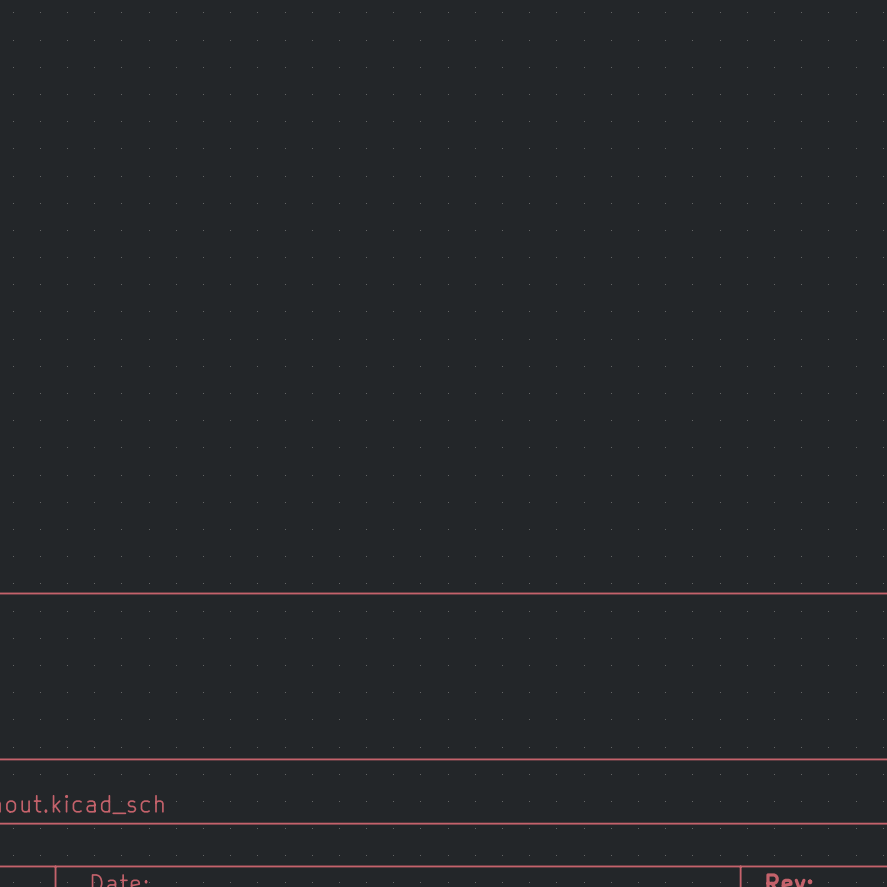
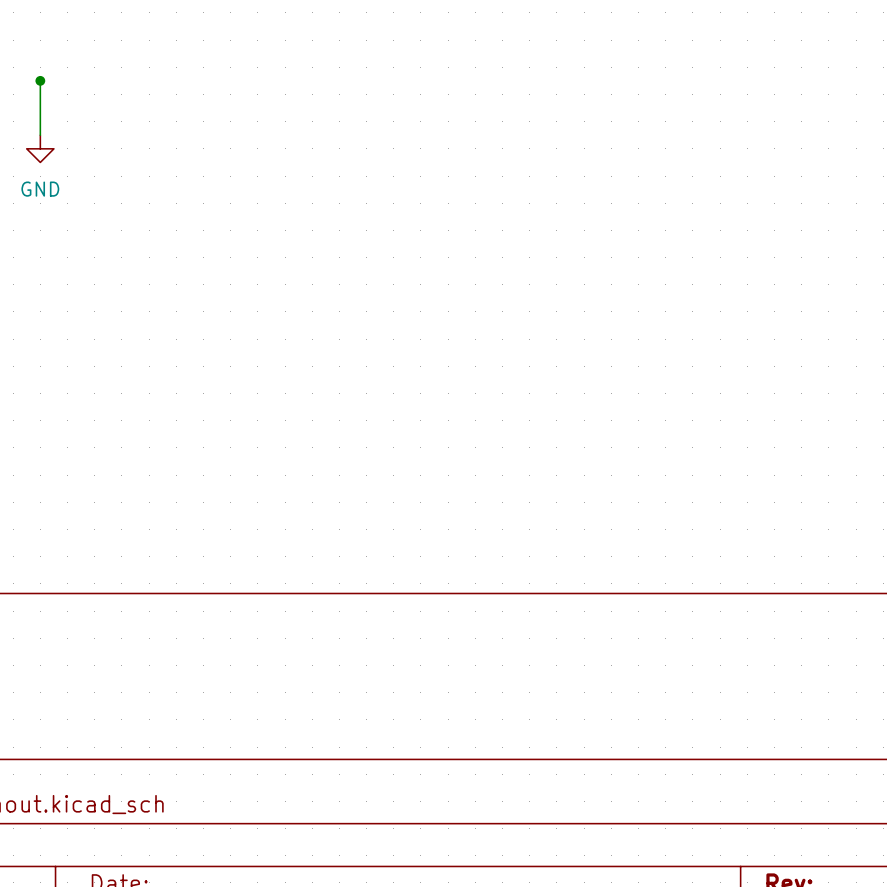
wire: none -> (40, 80) (40, 135)
junction: none -> (40, 80)
power symbol: none -> GND (40, 148)

